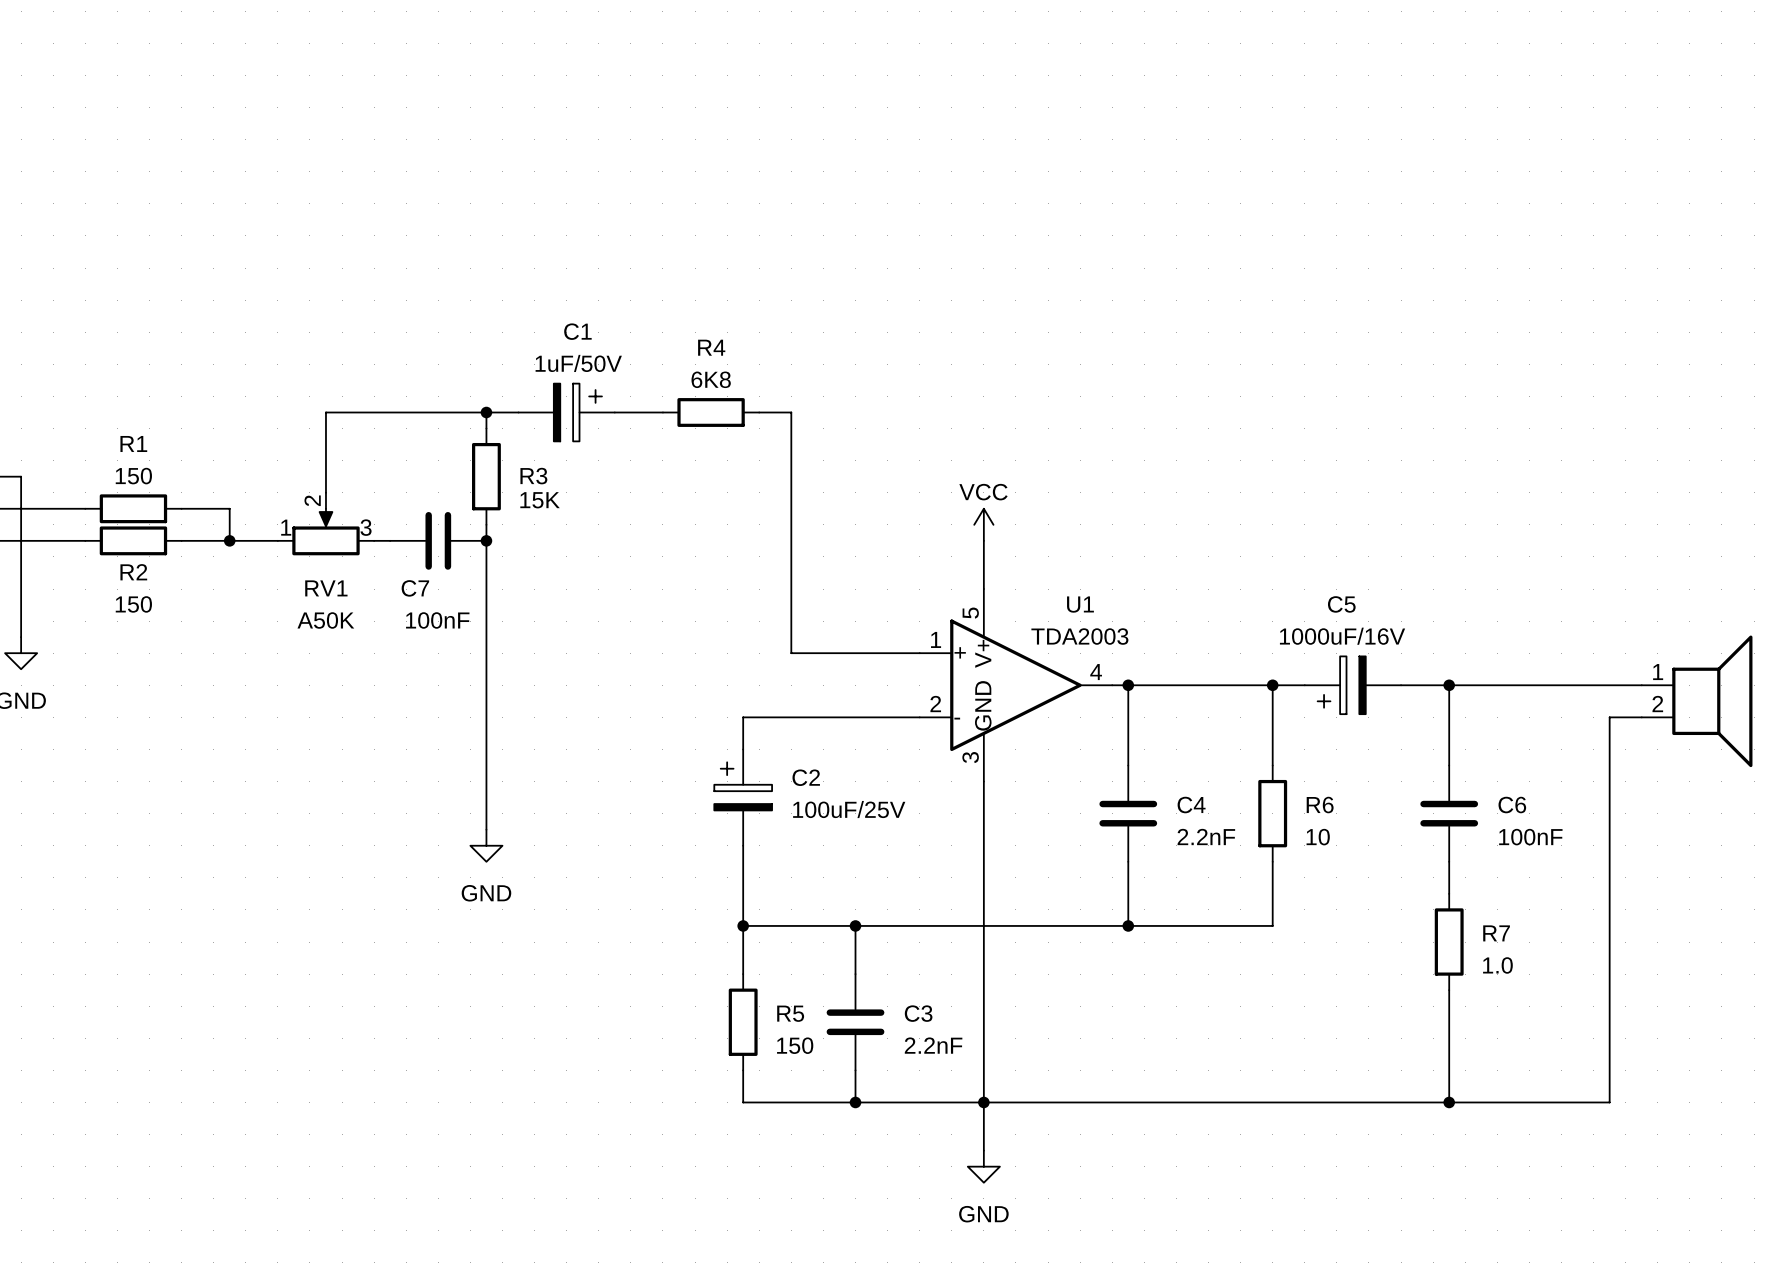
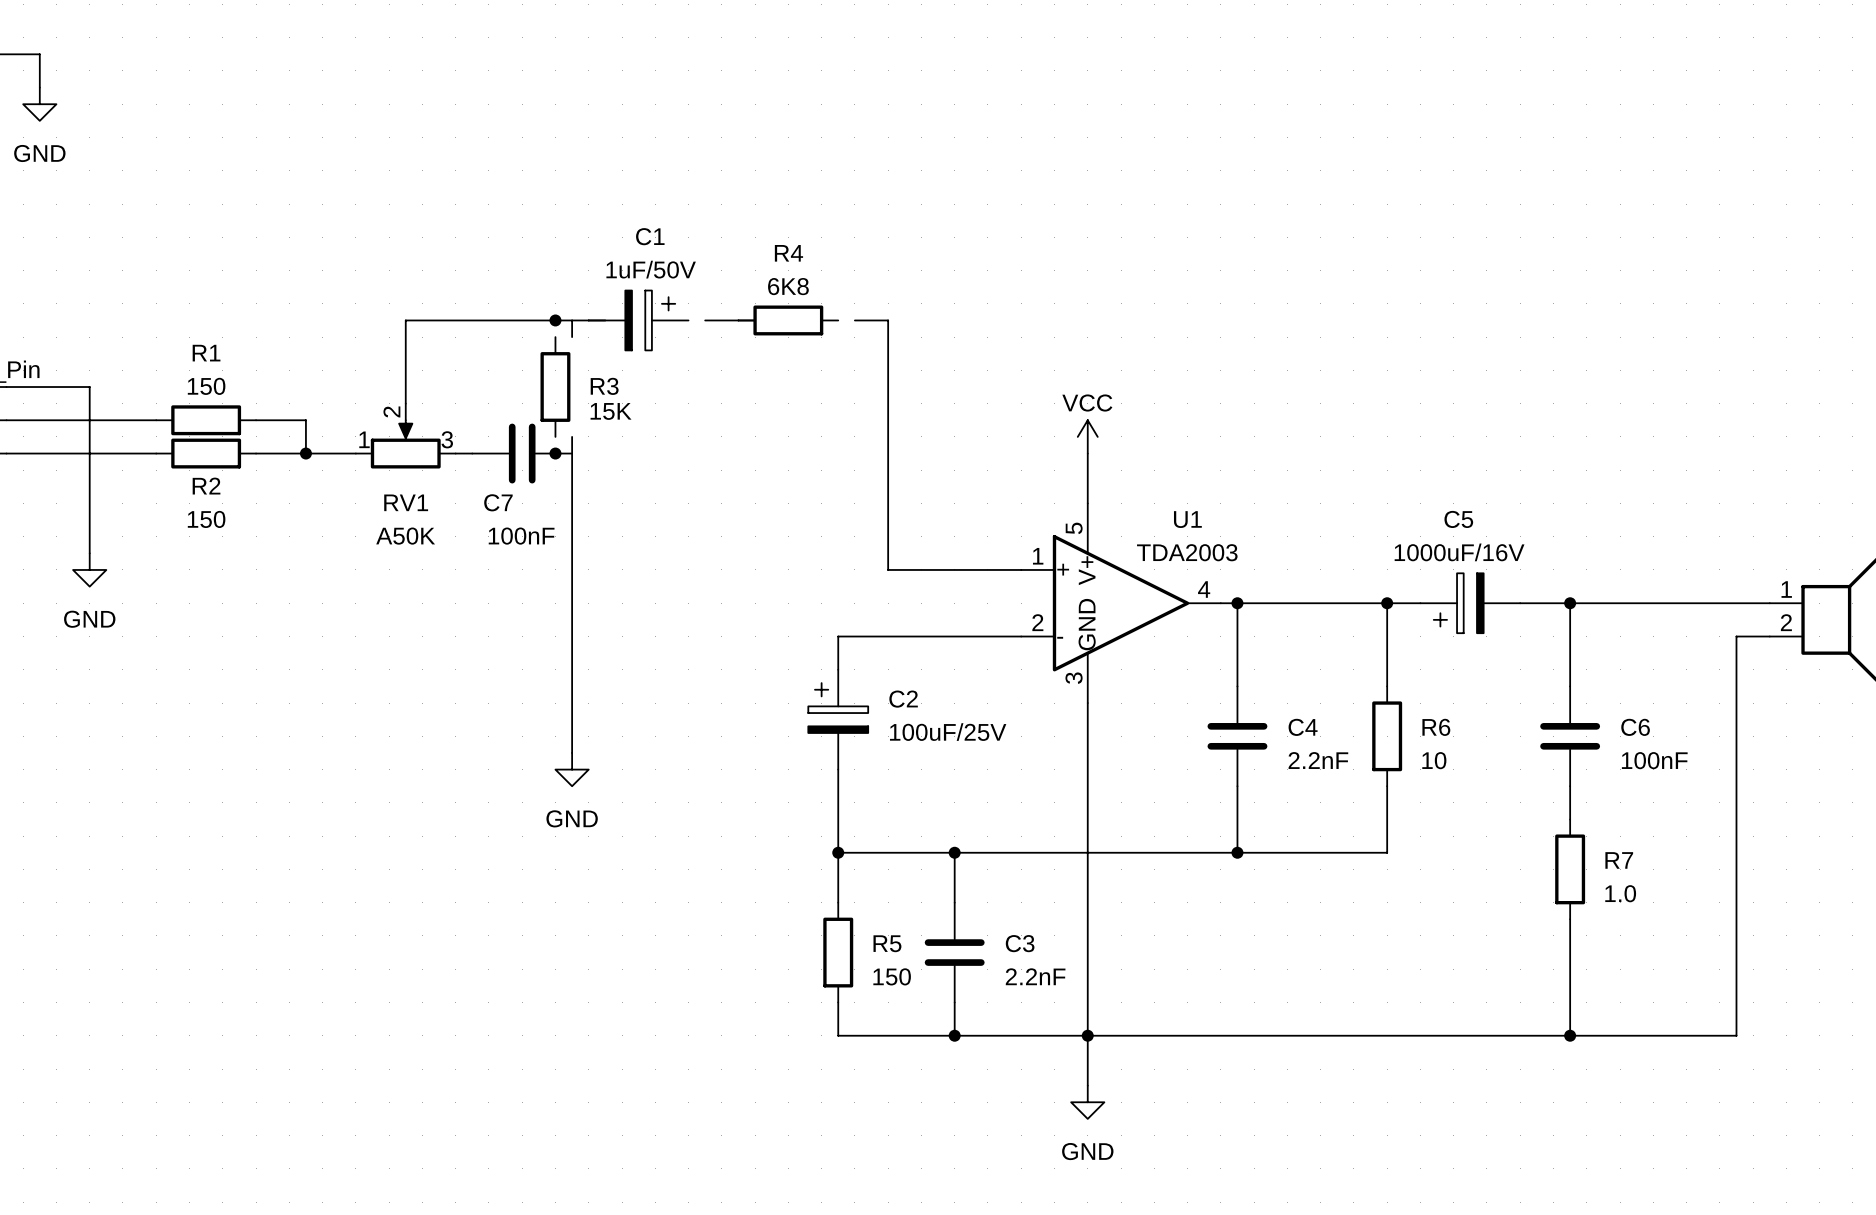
junction position: (486, 412) -> (555, 320)
C1 position: (566, 412) -> (638, 320)
R4 position: (711, 412) -> (788, 320)
R3 position: (486, 476) -> (555, 387)
junction position: (486, 540) -> (555, 453)

